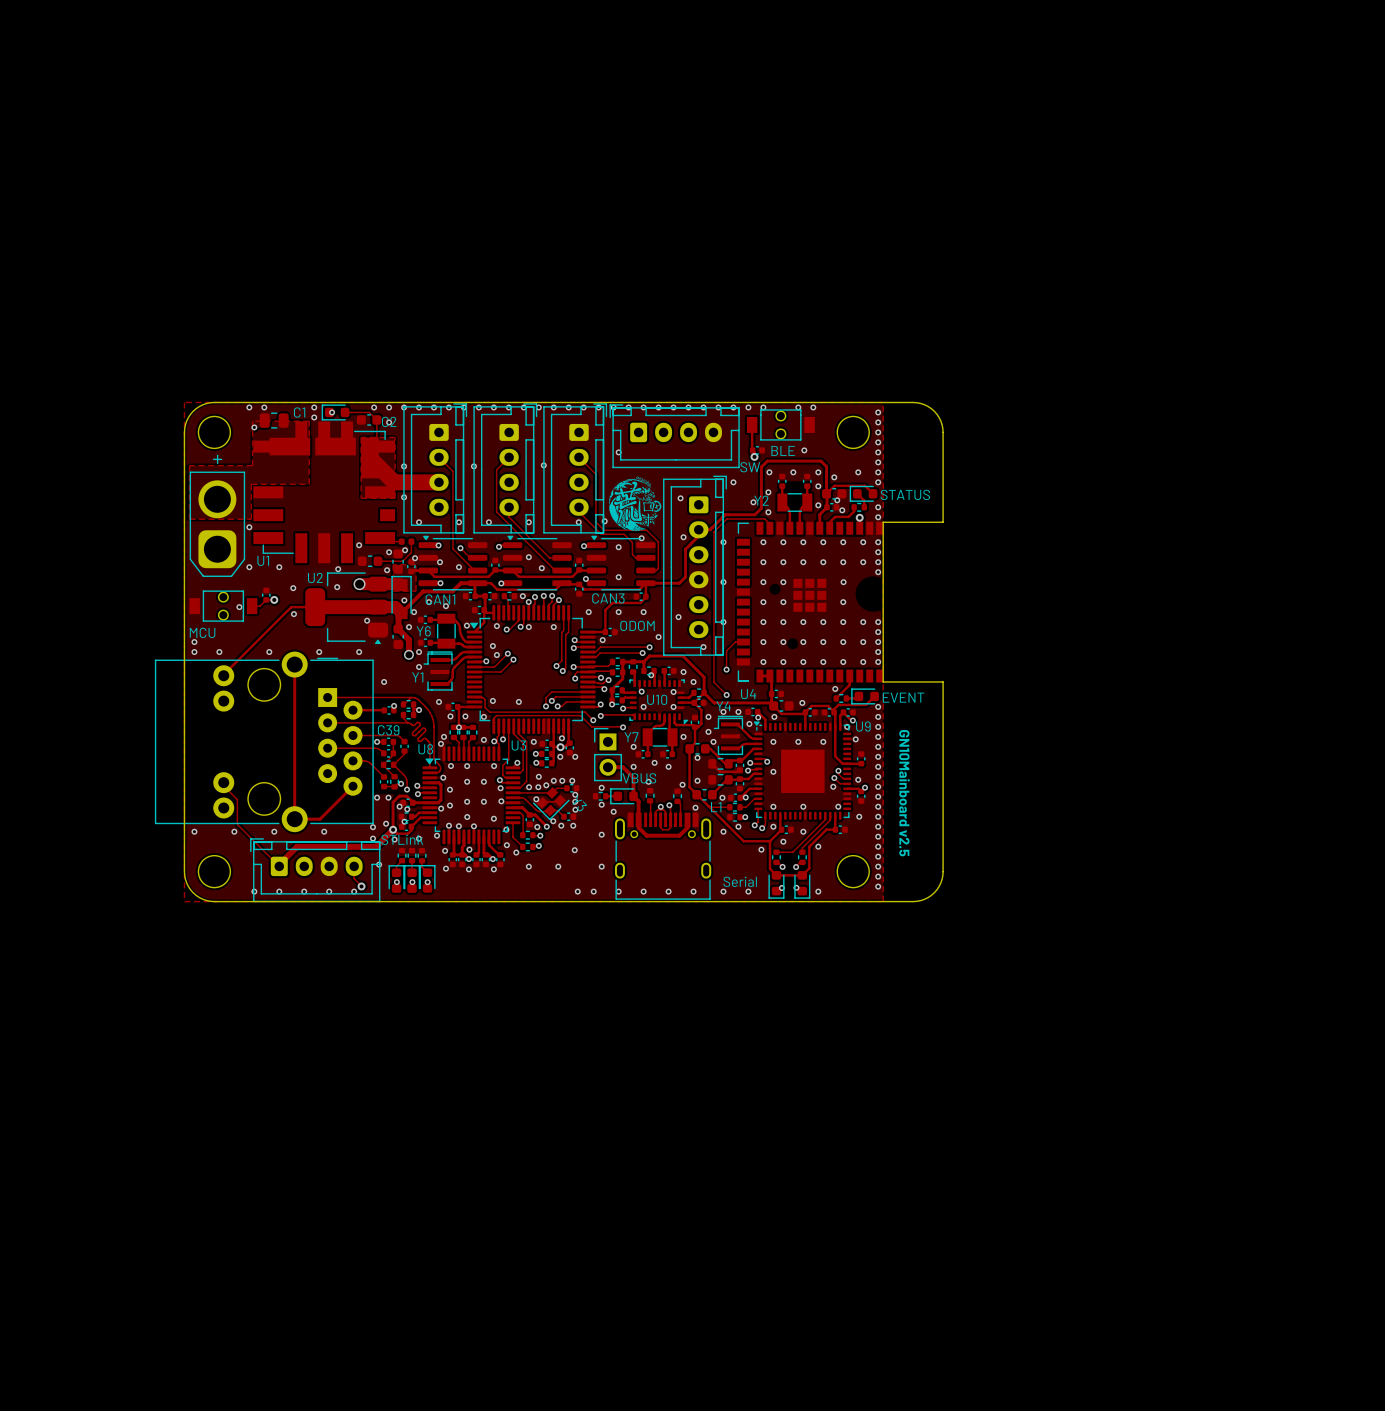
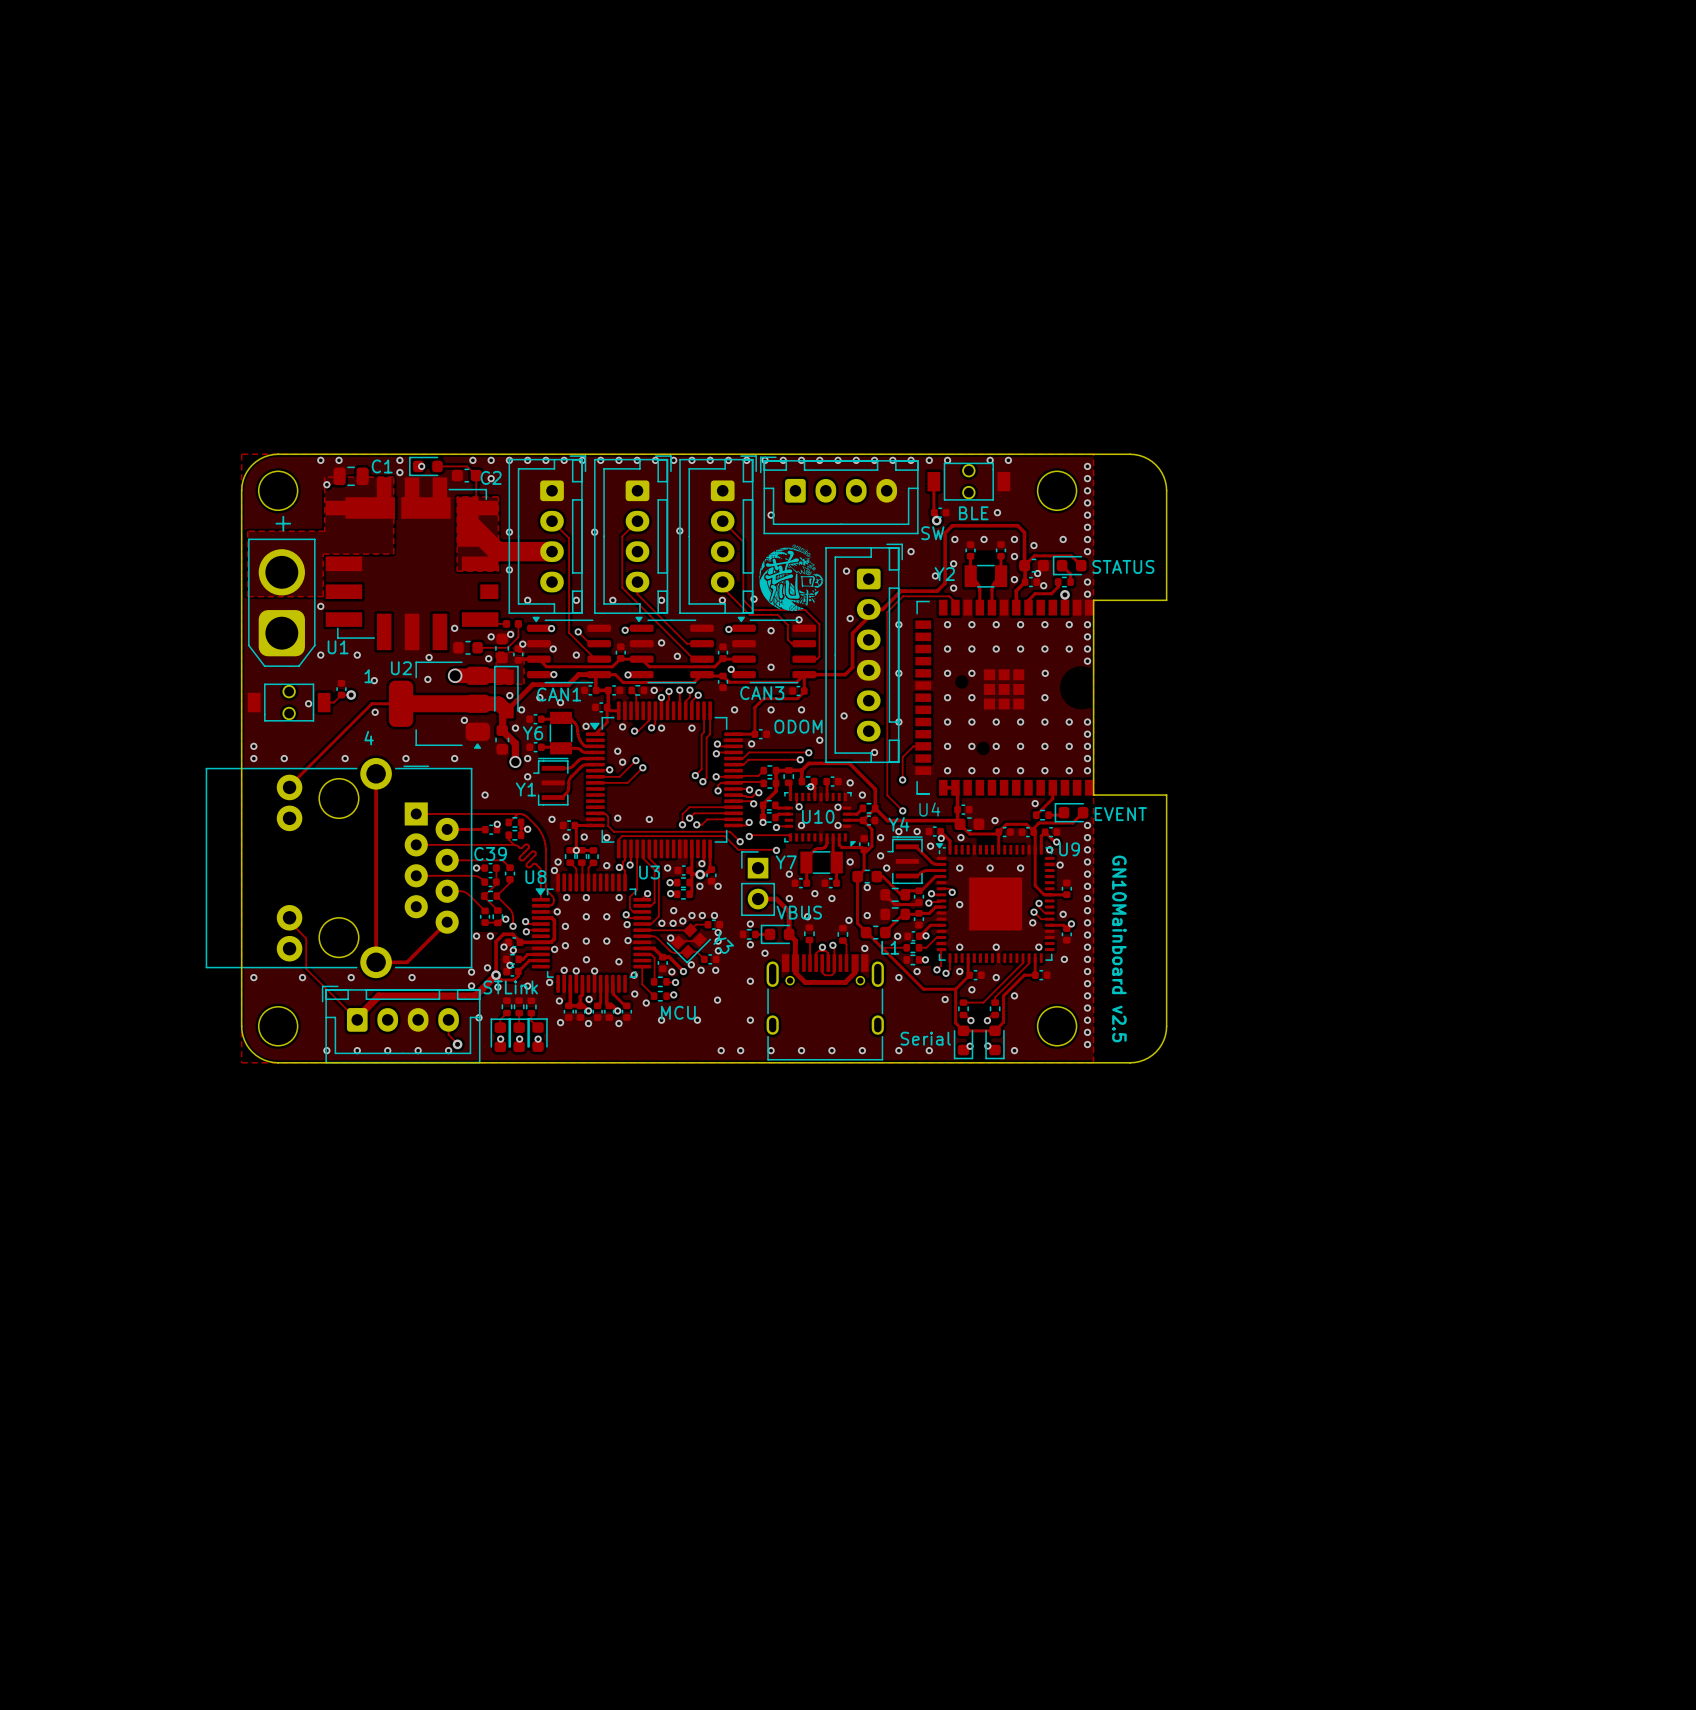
text: none -> 1 (368, 676)
text: MCU (202, 632) -> none
text: none -> 4 (369, 738)
text: none -> MCU (678, 1012)

